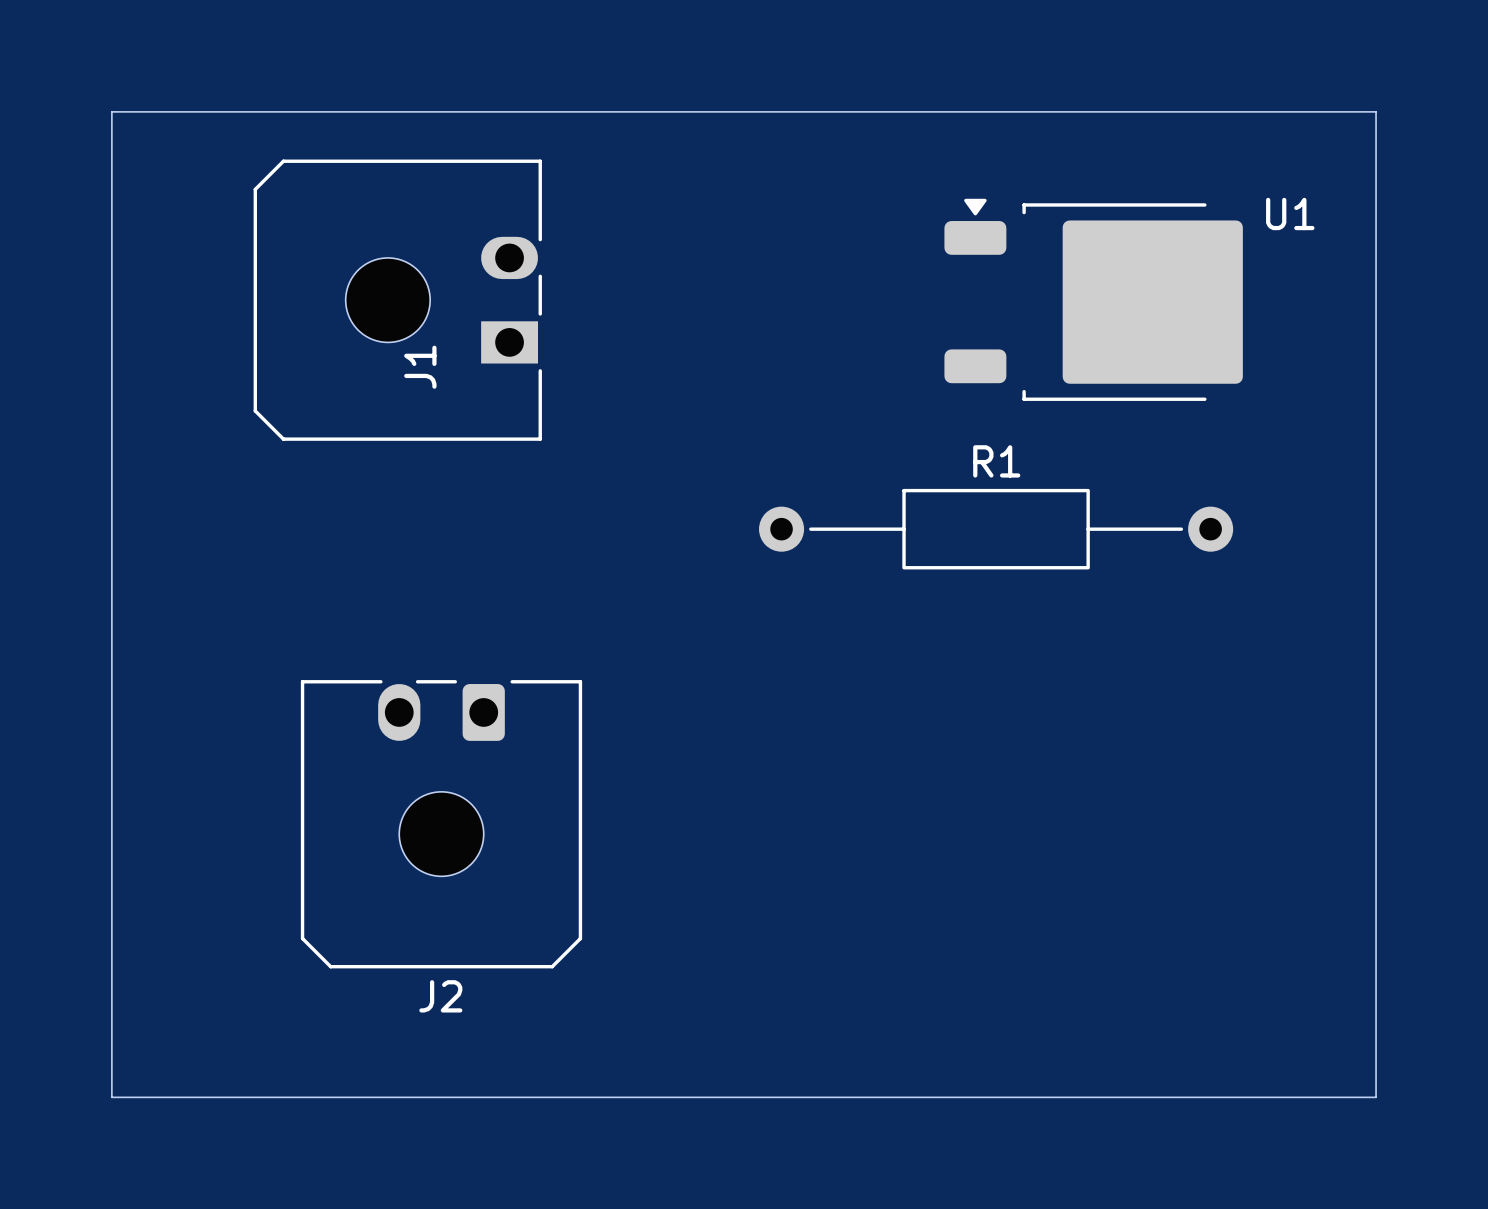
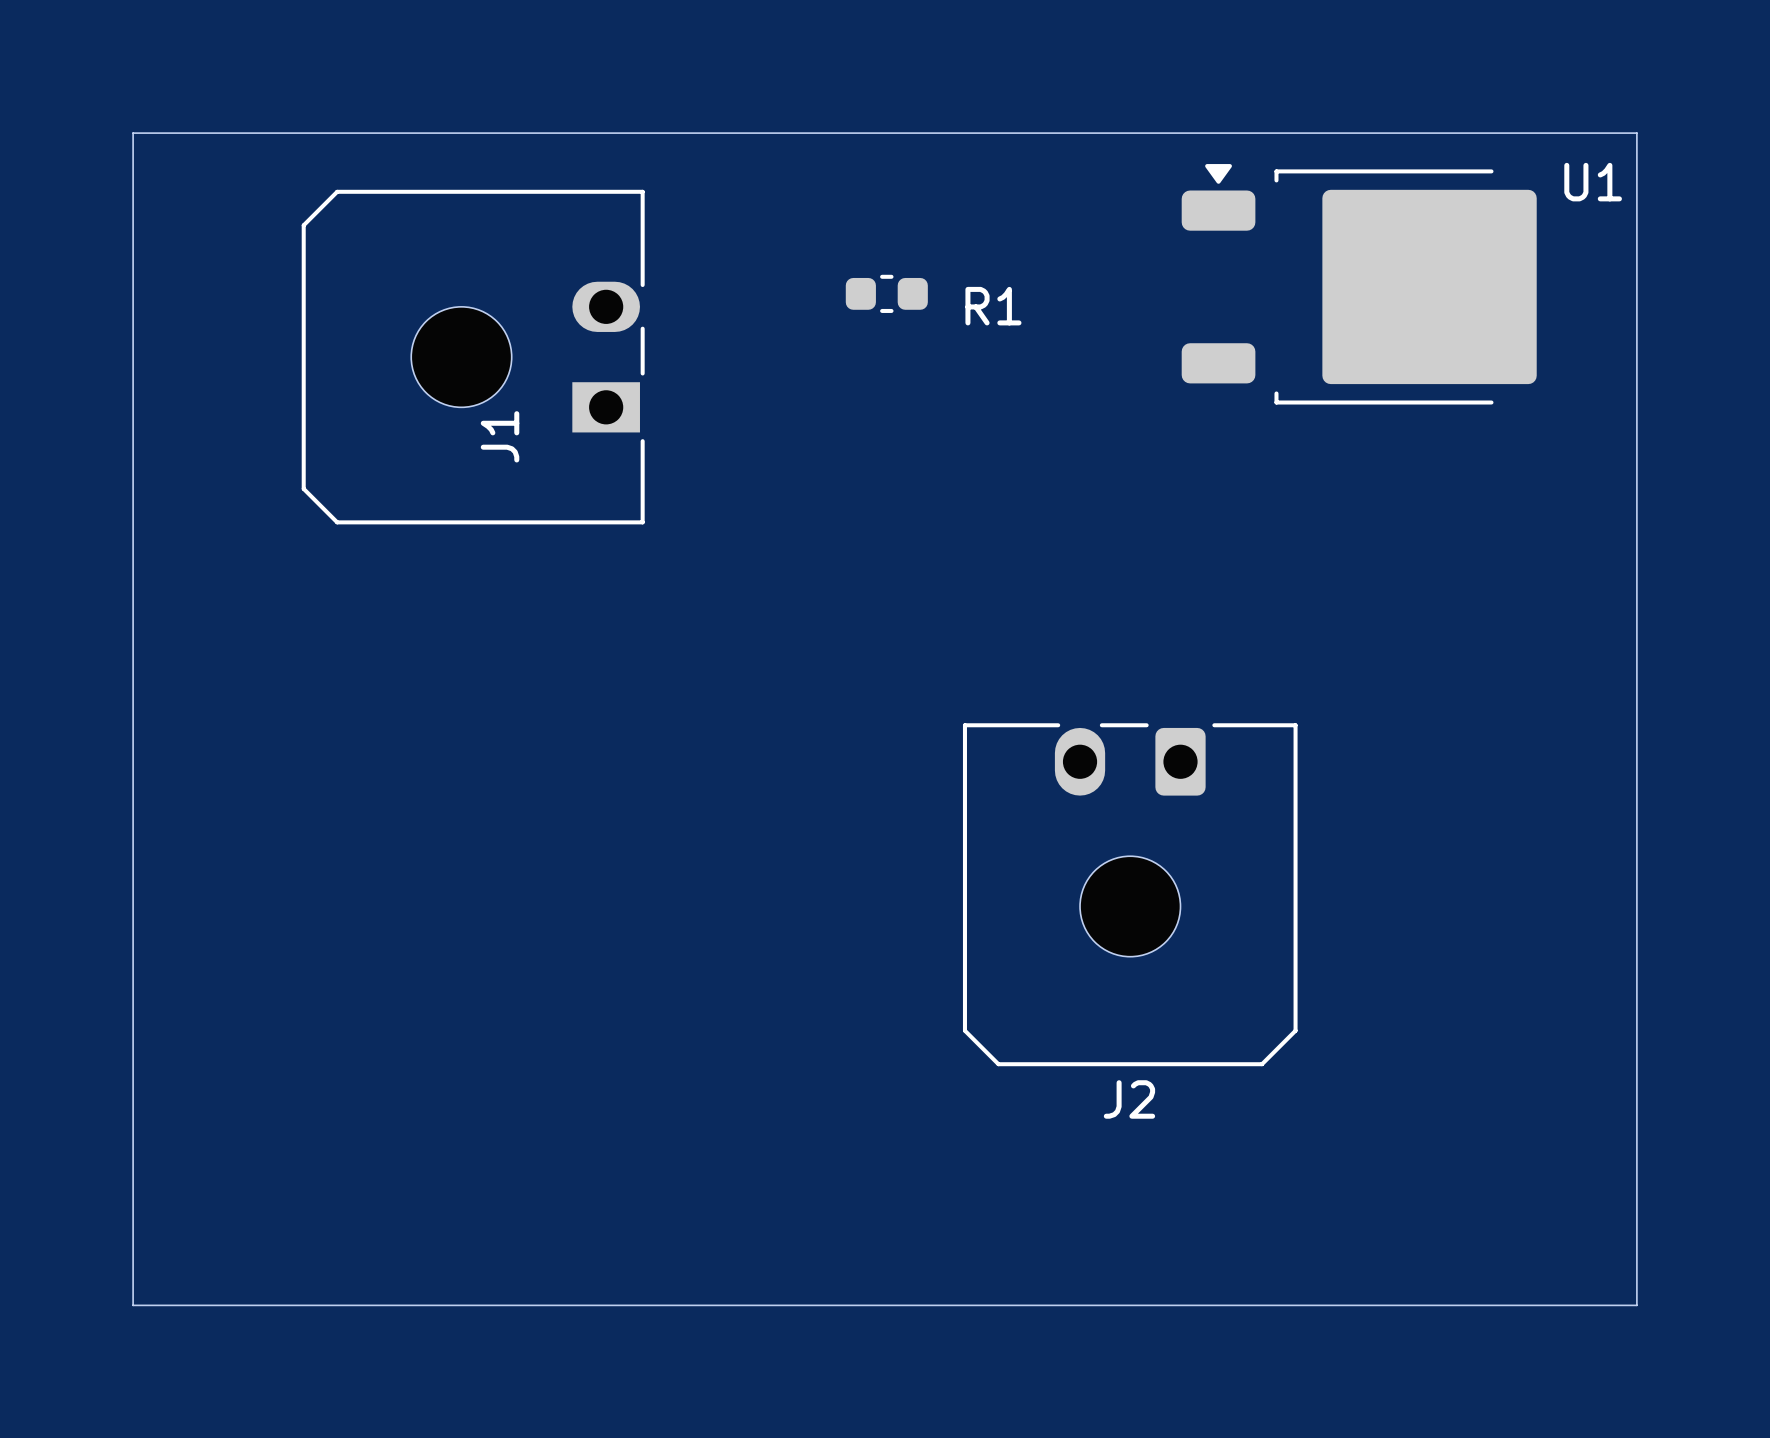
U1 position: (1093, 299) -> (1359, 284)
R1 name position: R1 (996, 461) -> R1 (993, 306)
R1 footprint: [759, 488, 1234, 570] -> [845, 274, 928, 313]
J2 position: (441, 824) -> (1130, 894)

